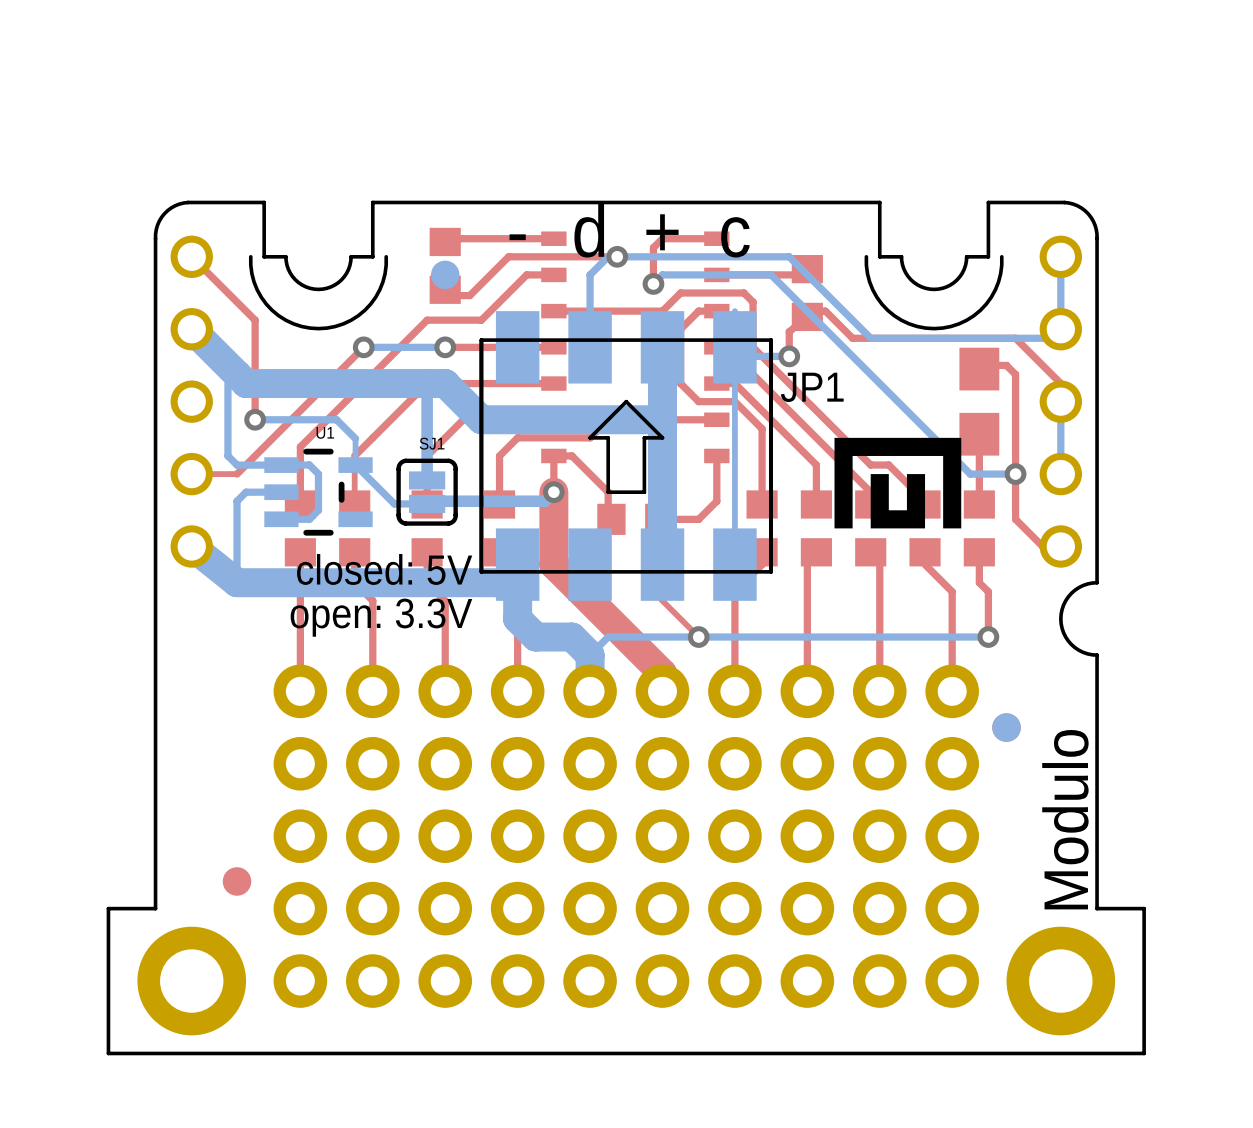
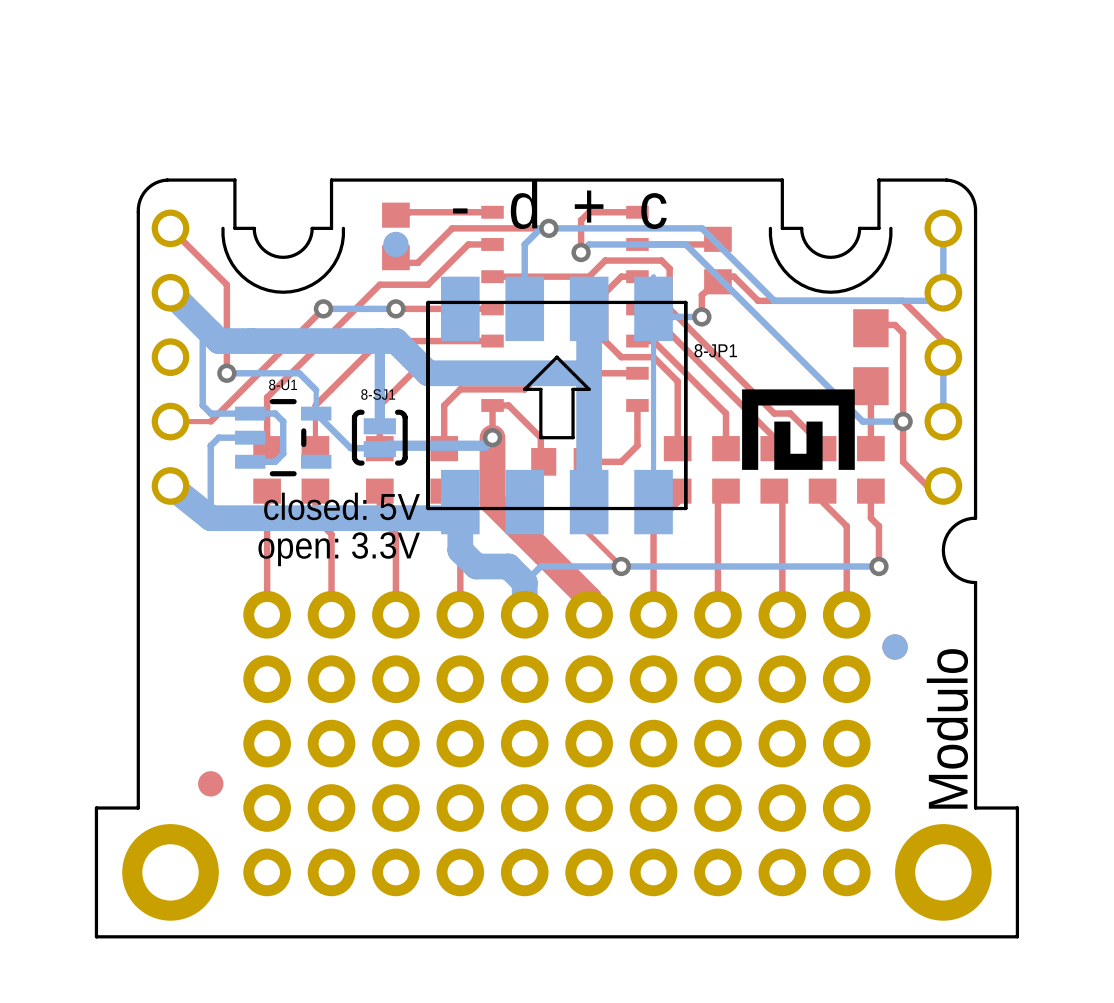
JP1 name: JP1 (812, 387) -> 8-JP1 (715, 350)
U1 name: U1 (325, 432) -> 8-U1 (283, 384)
SJ1: (427, 492) -> none
8-SJ1: none -> (379, 437)

